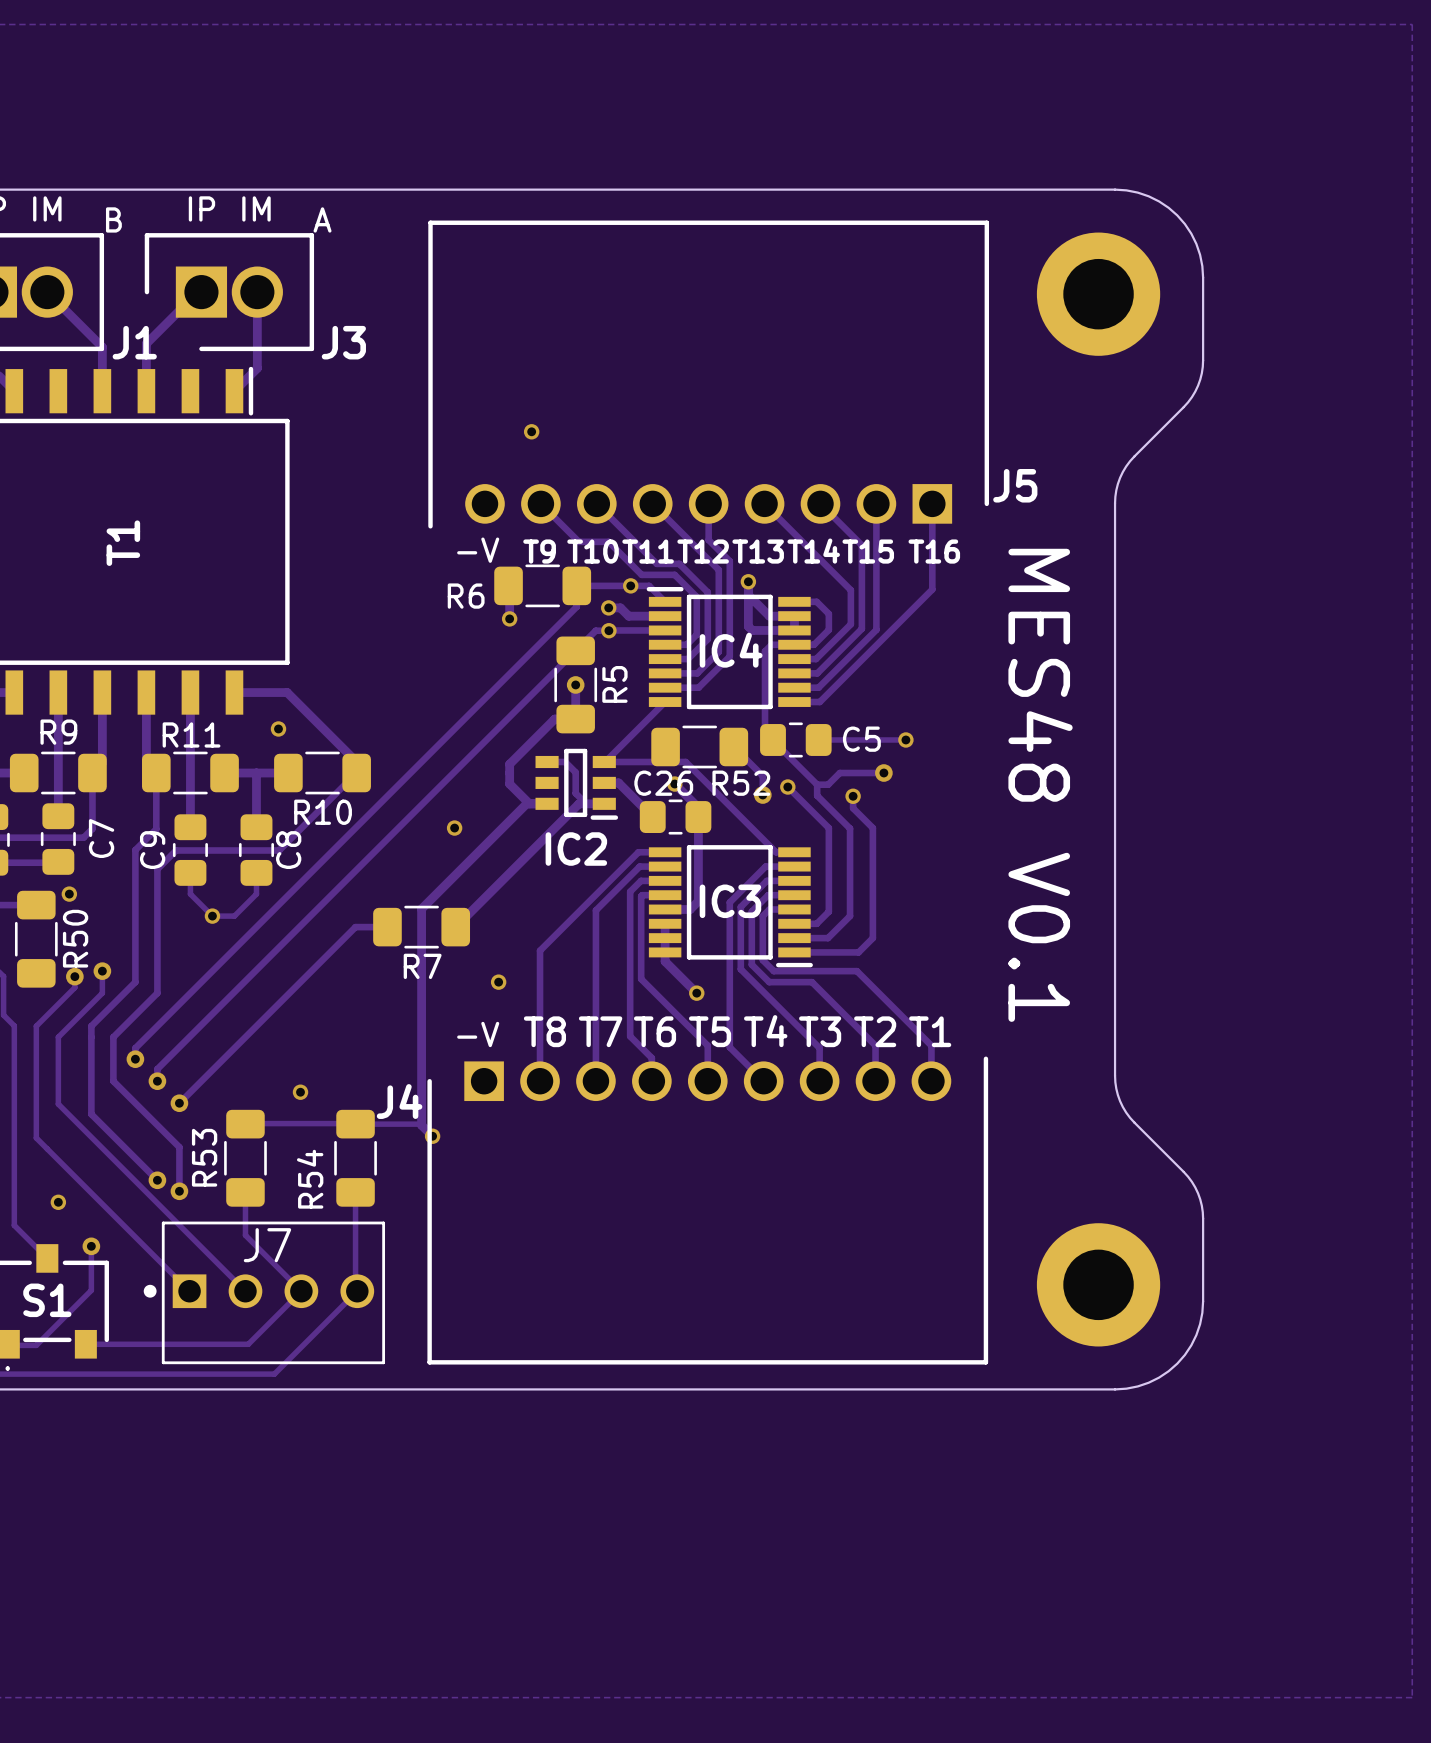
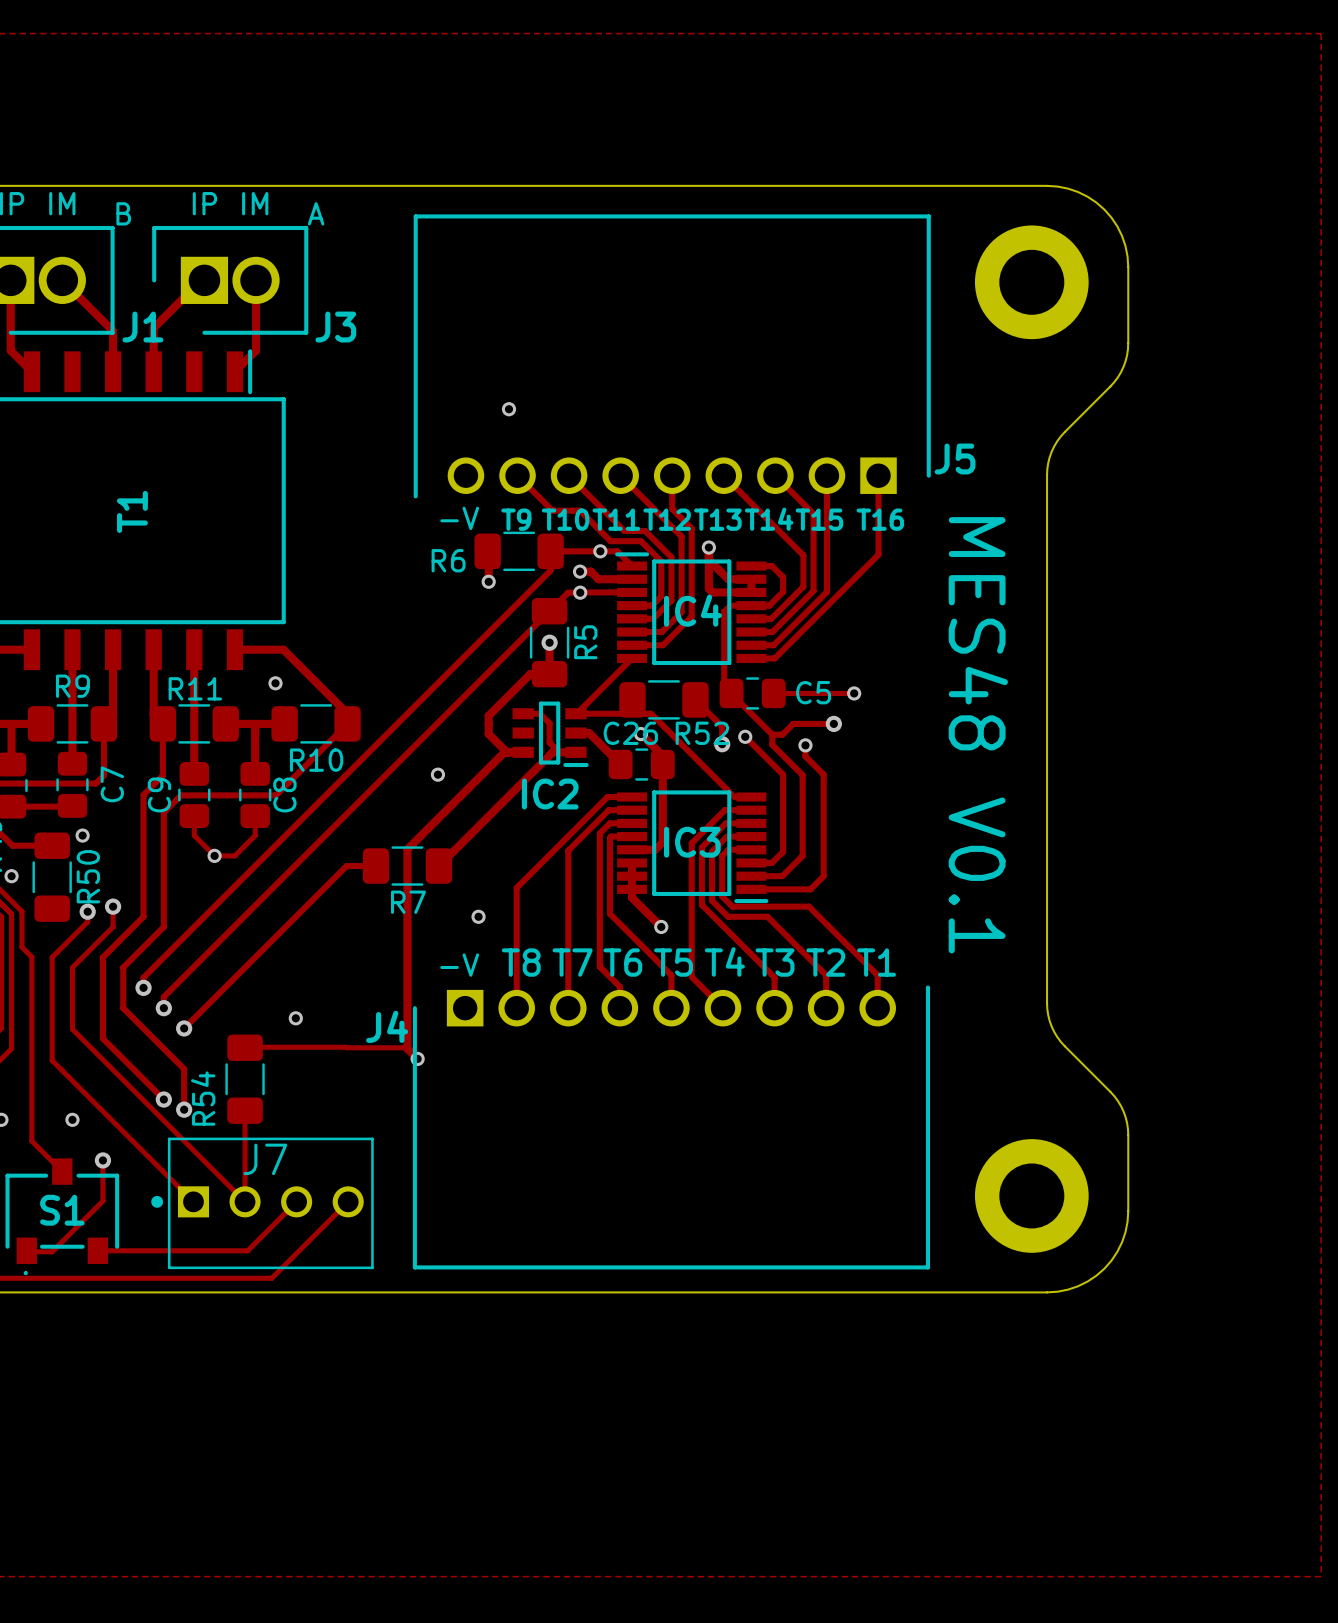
R53 name: R53 (204, 1157) -> R54 (203, 1098)
R54: (355, 1158) -> none
track: (355, 1192) (355, 1289) -> none
track: (245, 1235) (301, 1291) -> (245, 1150) (245, 1201)

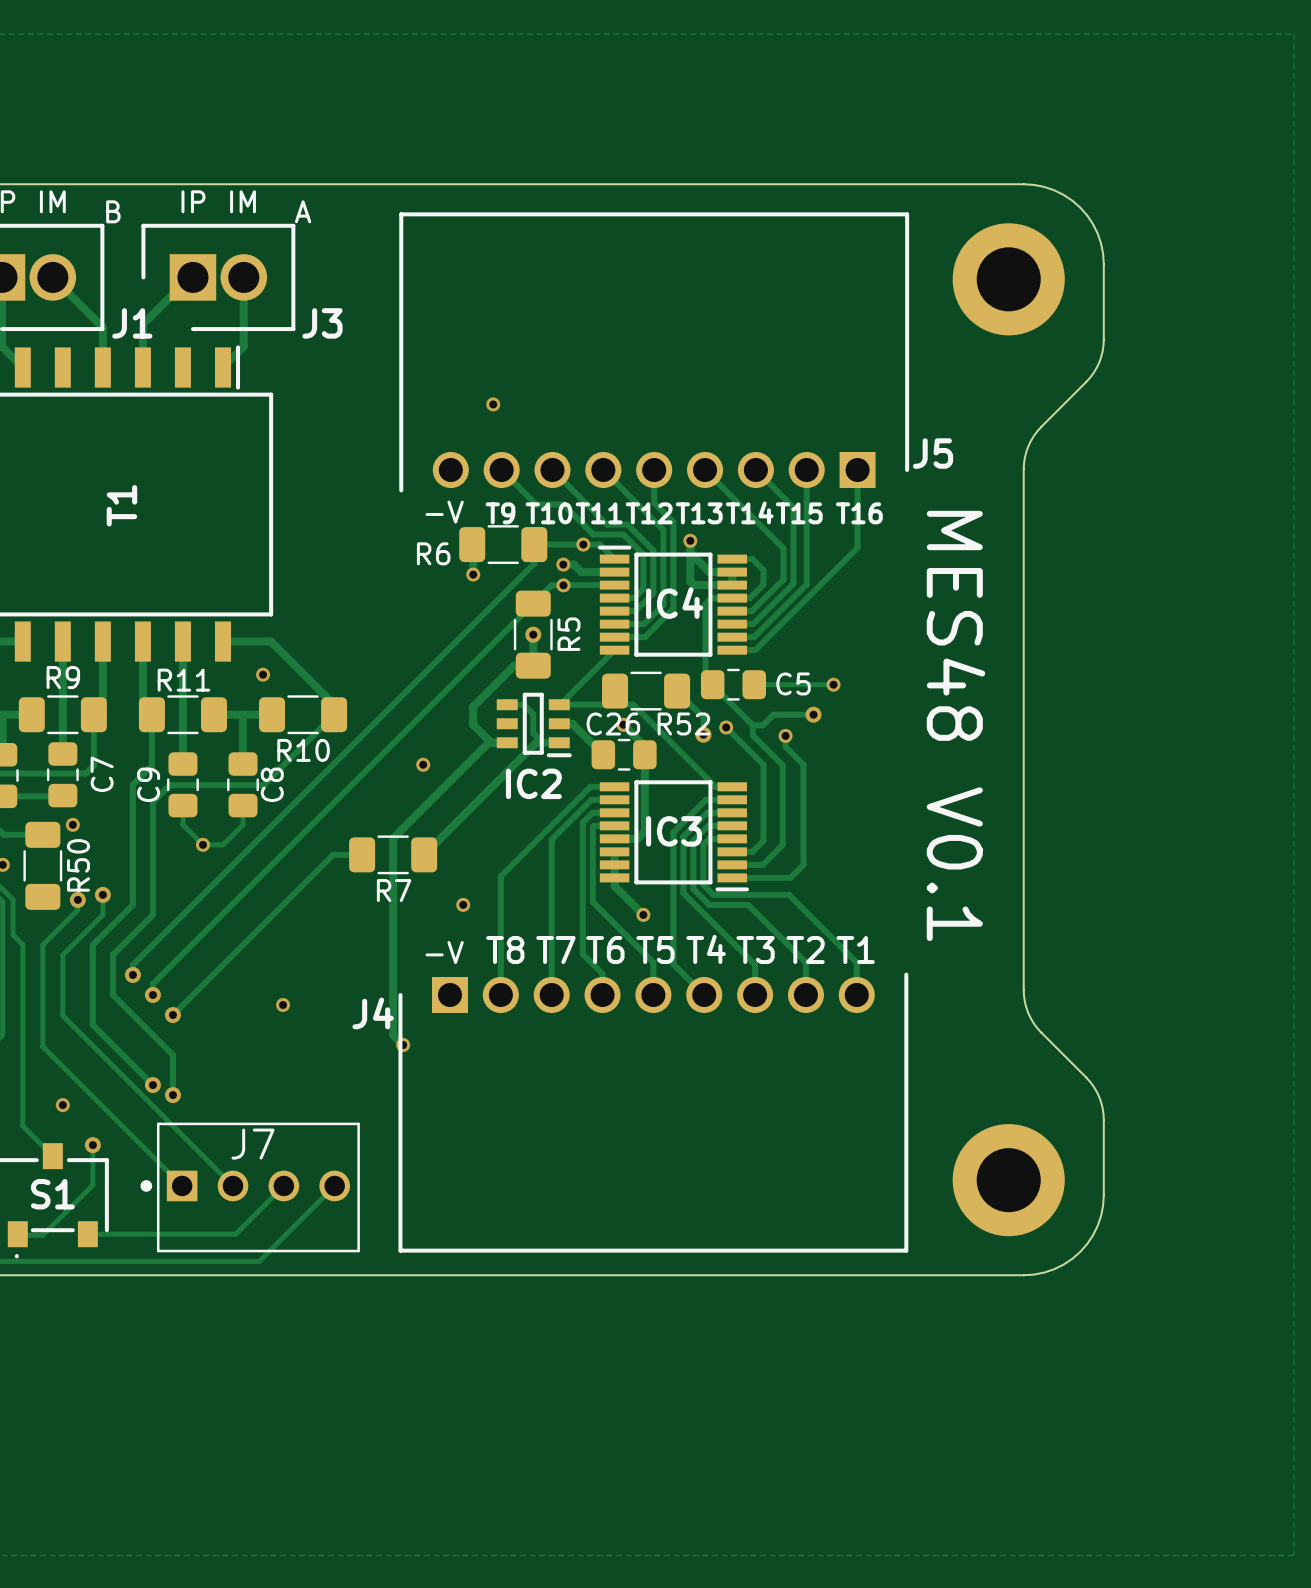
track: (245, 1047) (406, 1047) -> none
R54: (245, 1079) -> none
track: (245, 1110) (245, 1201) -> none

